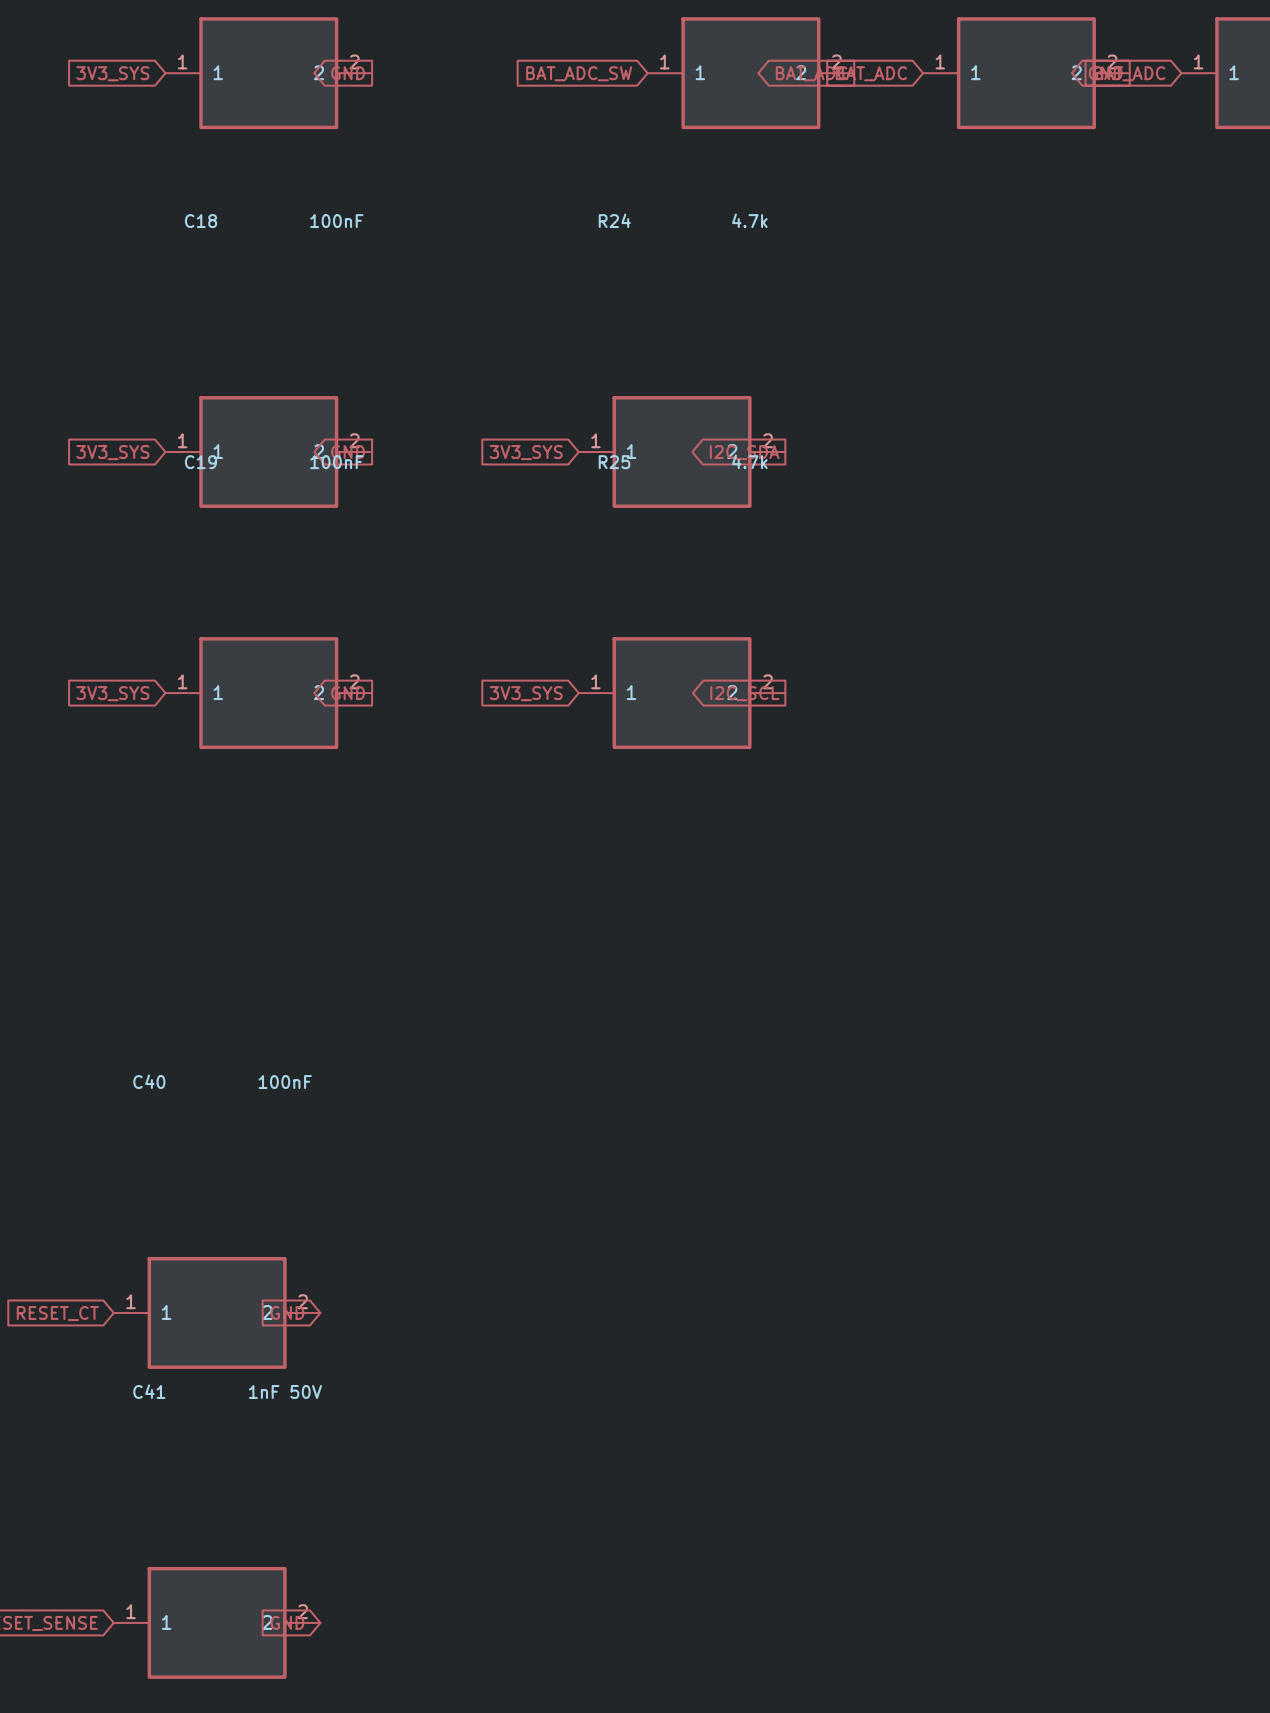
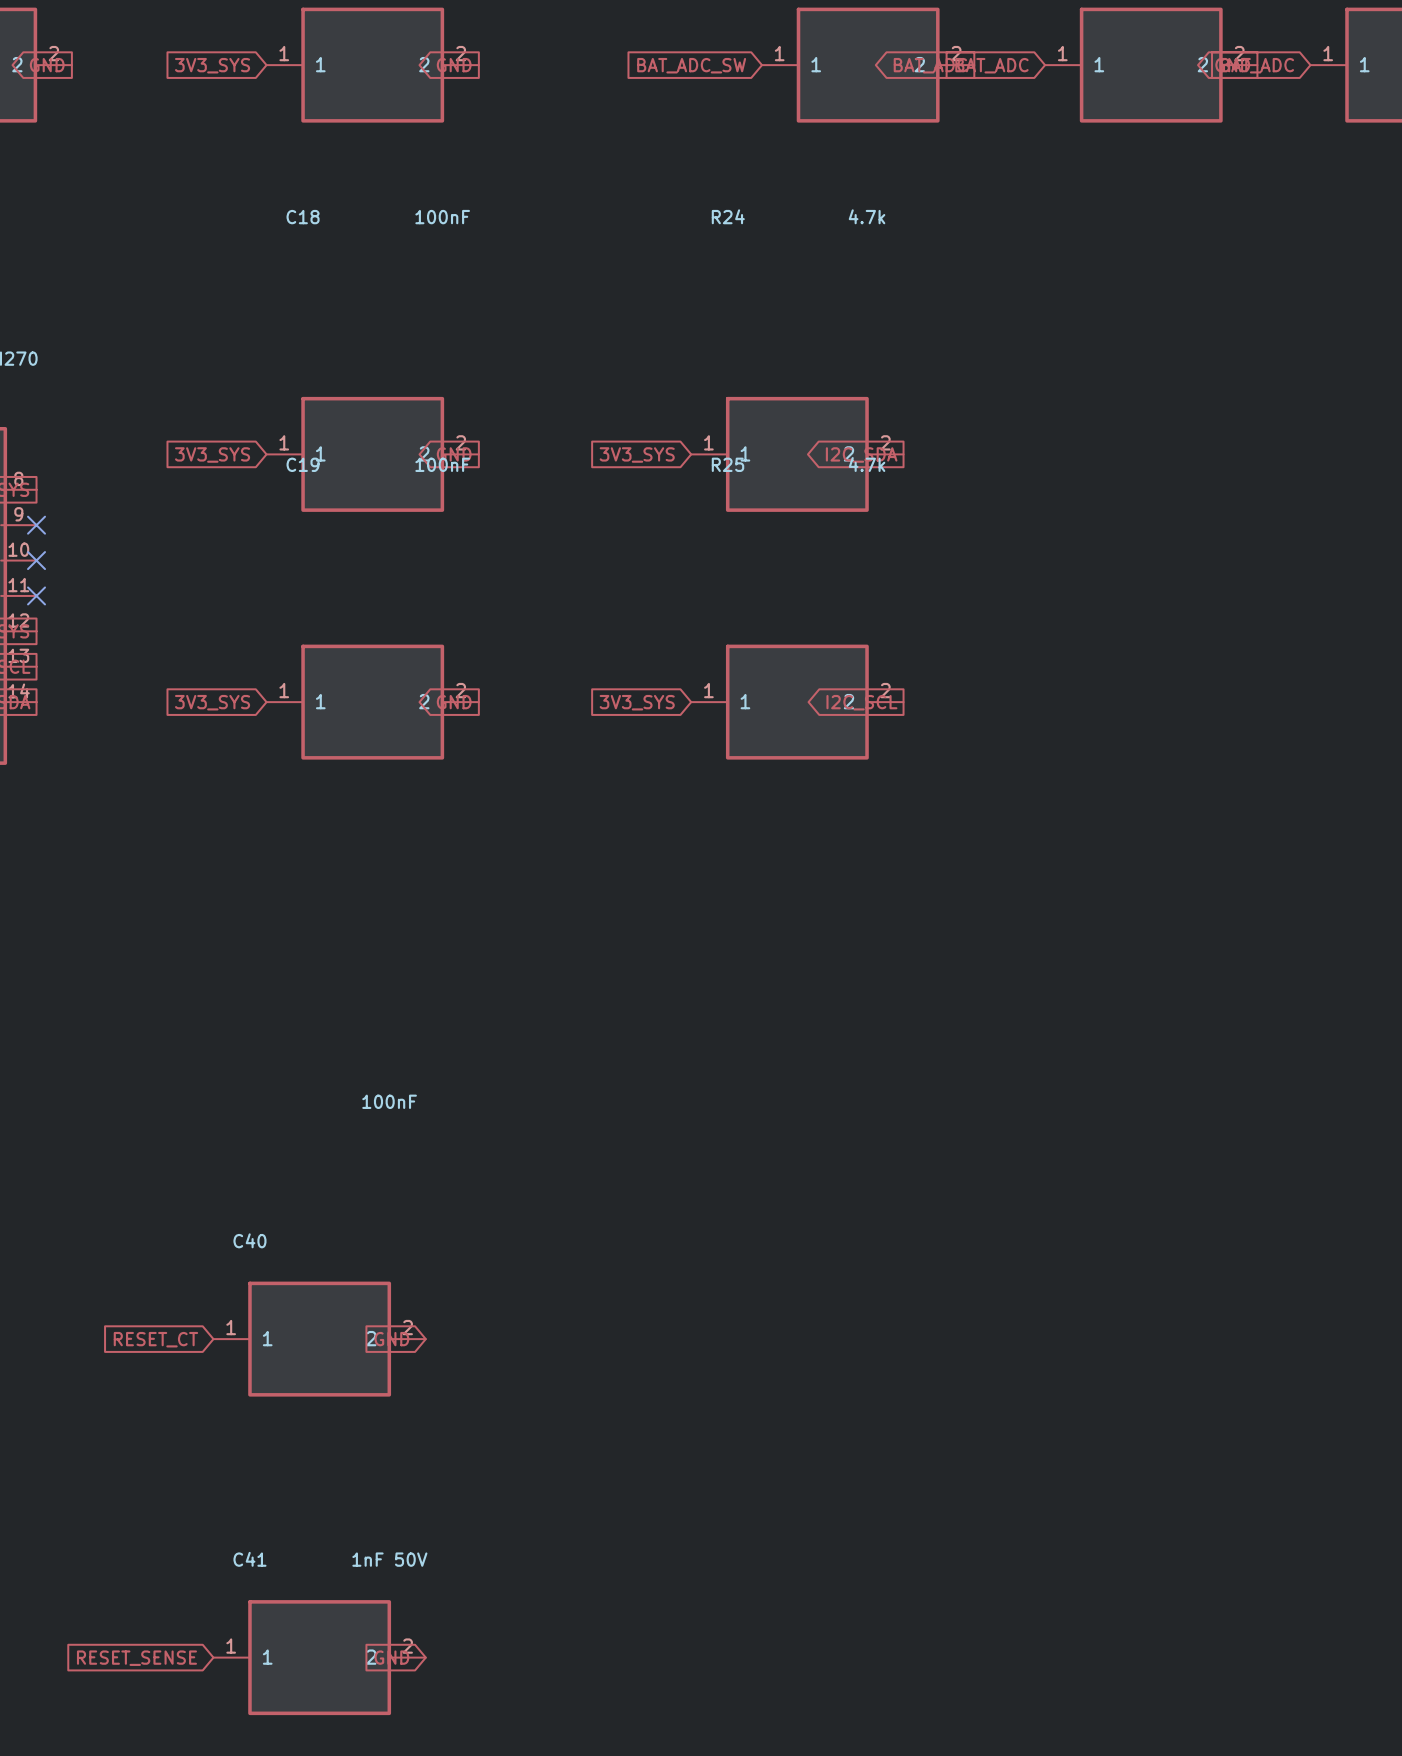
C40 name position: C40 (149, 1081) -> C40 (249, 1240)
C41 name position: C41 (149, 1391) -> C41 (249, 1559)
C41 value position: 1nF 50V (285, 1391) -> 1nF 50V (389, 1559)

